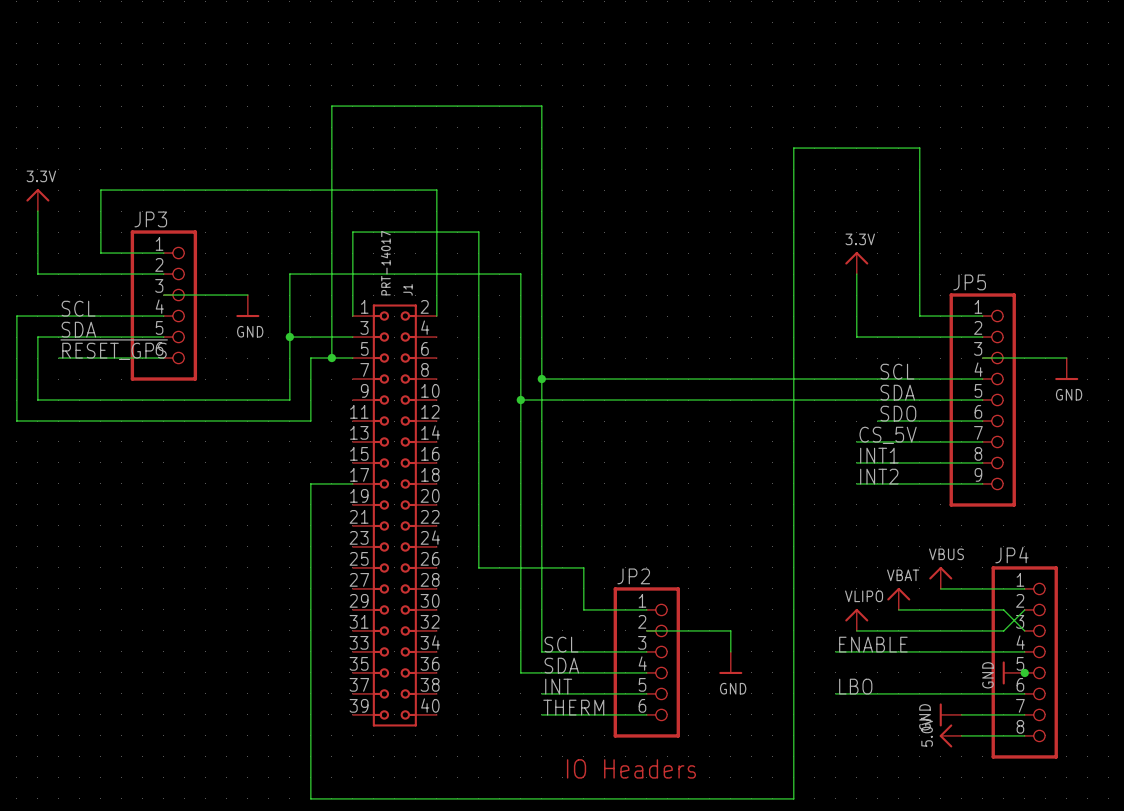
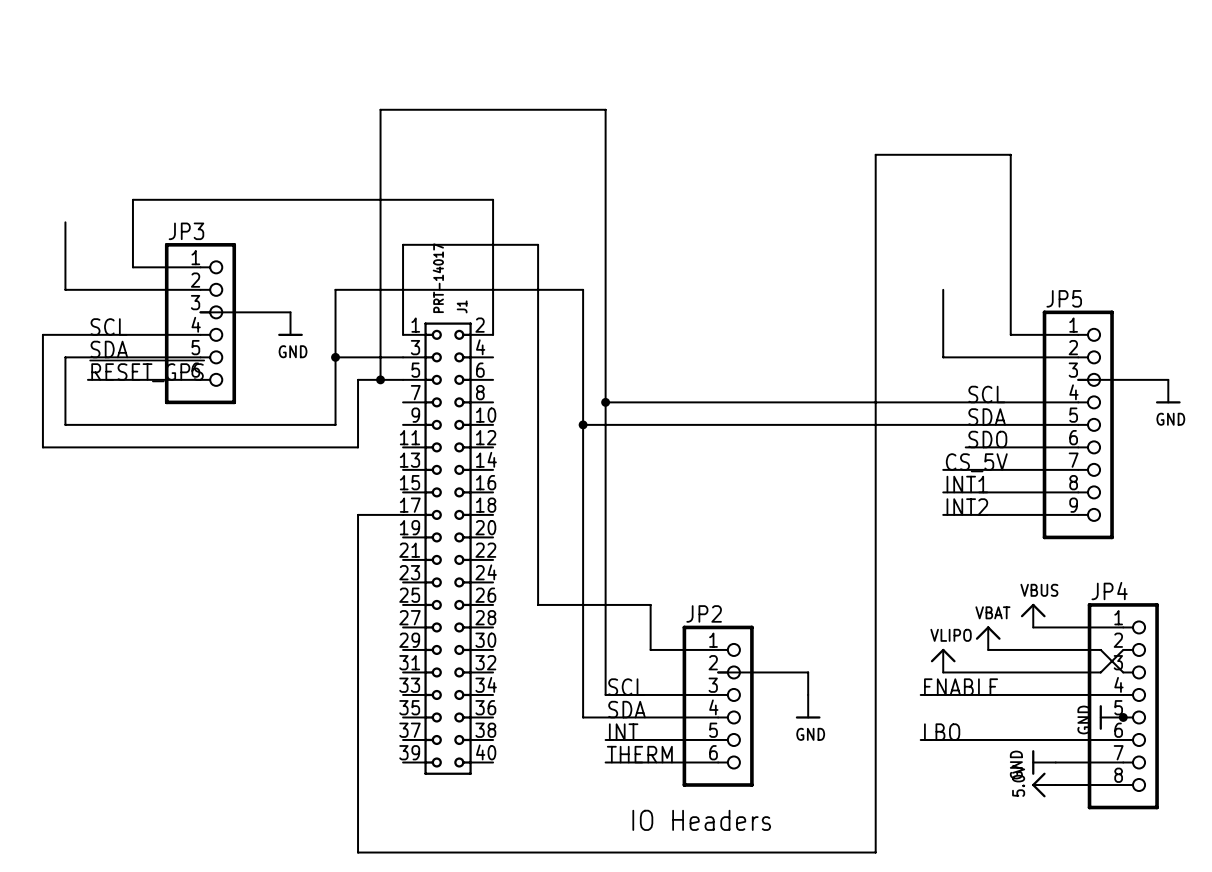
power symbol: 3.3V (37, 200) -> none
power symbol: 3.3V (856, 263) -> none

